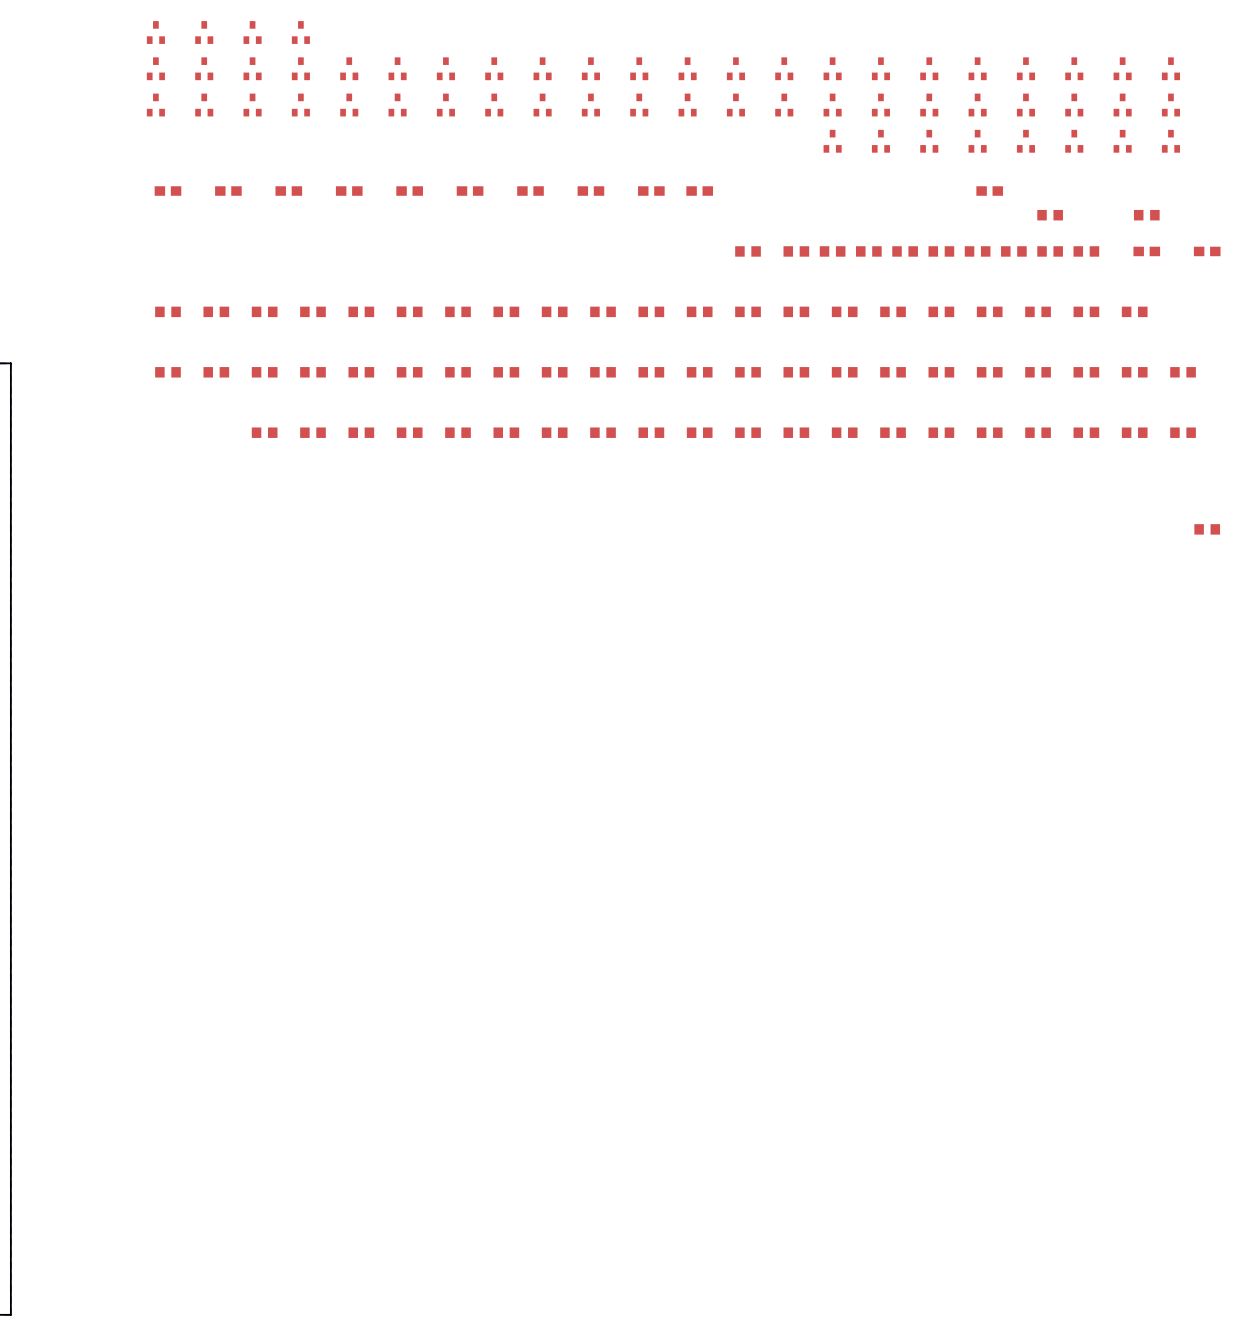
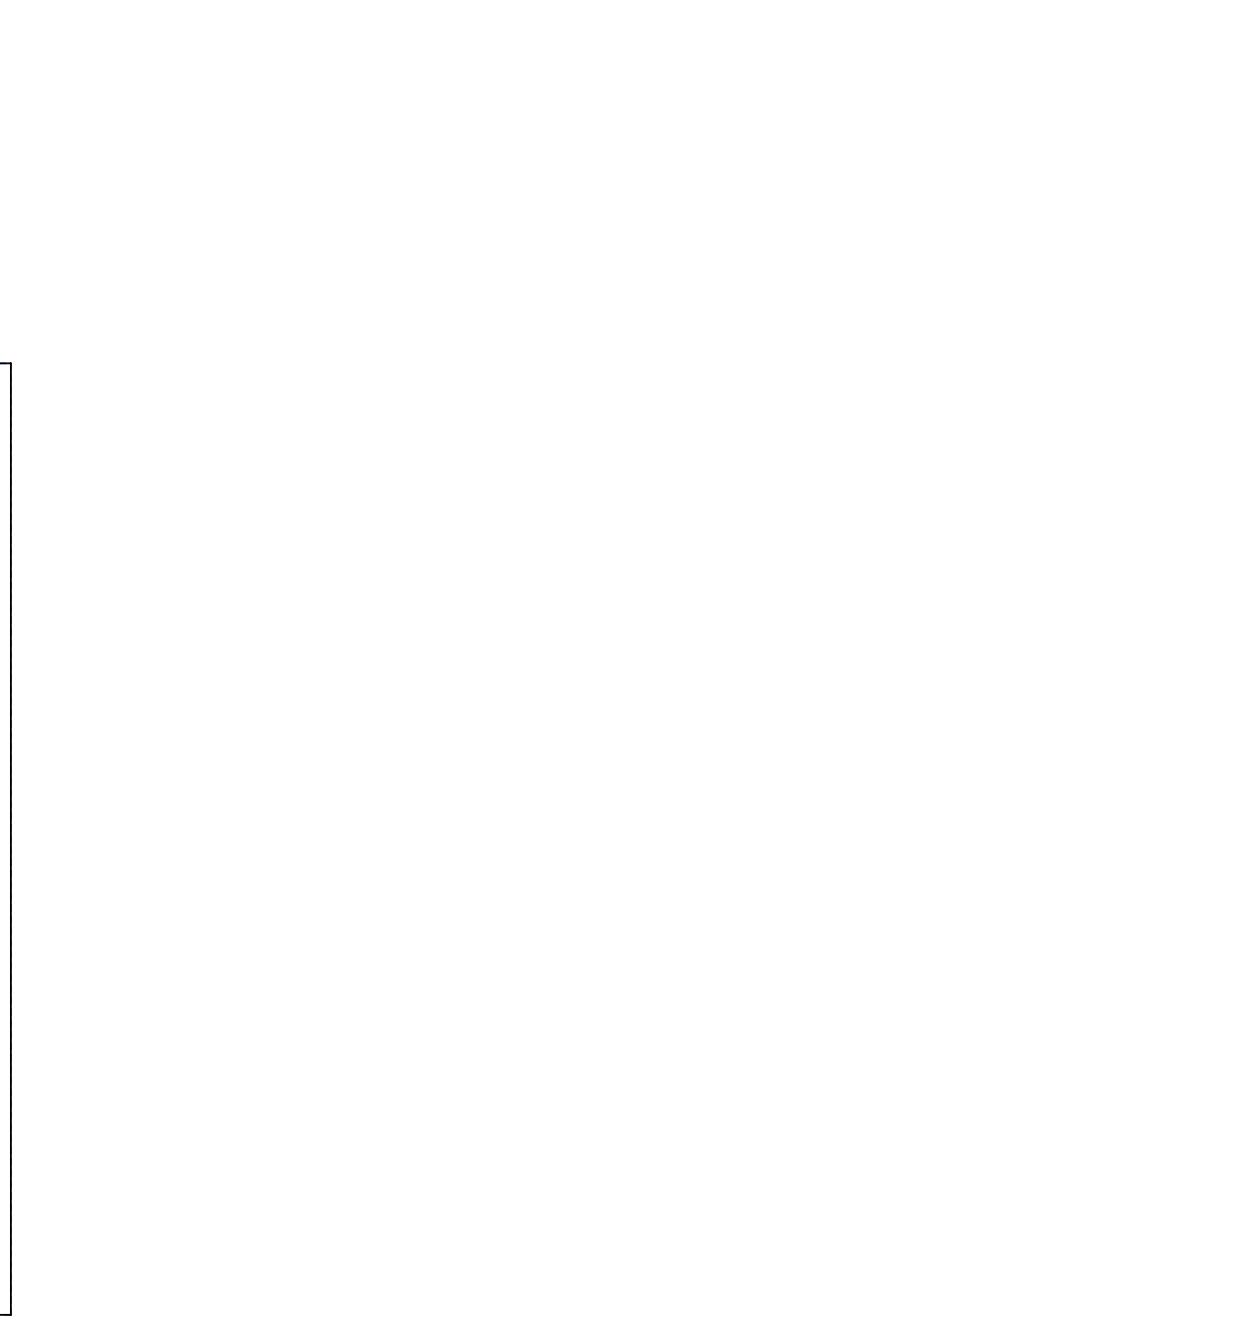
part: (155, 32) -> none
part: (204, 32) -> none
part: (252, 32) -> none
part: (300, 32) -> none
part: (155, 68) -> none
part: (204, 68) -> none
part: (252, 68) -> none
part: (300, 68) -> none
part: (349, 68) -> none
part: (397, 68) -> none
part: (445, 68) -> none
part: (494, 68) -> none
part: (542, 68) -> none
part: (590, 68) -> none
part: (639, 68) -> none
part: (687, 68) -> none
part: (735, 68) -> none
part: (784, 68) -> none
part: (832, 68) -> none
part: (880, 68) -> none
part: (929, 68) -> none
part: (977, 68) -> none
part: (1025, 68) -> none
part: (1074, 68) -> none
part: (1122, 68) -> none
part: (1170, 68) -> none
part: (155, 105) -> none
part: (204, 105) -> none
part: (252, 105) -> none
part: (300, 105) -> none
part: (349, 105) -> none
part: (397, 105) -> none
part: (445, 105) -> none
part: (494, 105) -> none
part: (542, 105) -> none
part: (590, 105) -> none
part: (639, 105) -> none
part: (687, 105) -> none
part: (735, 105) -> none
part: (784, 105) -> none
part: (832, 105) -> none
part: (880, 105) -> none
part: (929, 105) -> none
part: (977, 105) -> none
part: (1025, 105) -> none
part: (1074, 105) -> none
part: (1122, 105) -> none
part: (1170, 105) -> none
part: (832, 141) -> none
part: (880, 141) -> none
part: (929, 141) -> none
part: (977, 141) -> none
part: (1025, 141) -> none
part: (1074, 141) -> none
part: (1122, 141) -> none
part: (1170, 141) -> none
part: (167, 191) -> none
part: (228, 191) -> none
part: (288, 191) -> none
part: (349, 191) -> none
part: (409, 191) -> none
part: (470, 191) -> none
part: (530, 191) -> none
part: (590, 191) -> none
part: (651, 191) -> none
part: (699, 191) -> none
part: (989, 191) -> none
part: (1050, 215) -> none
part: (1146, 215) -> none
part: (748, 251) -> none
part: (796, 251) -> none
part: (832, 251) -> none
part: (868, 251) -> none
part: (905, 251) -> none
part: (941, 251) -> none
part: (977, 251) -> none
part: (1013, 251) -> none
part: (1050, 251) -> none
part: (1086, 251) -> none
part: (1146, 251) -> none
part: (1207, 251) -> none
part: (167, 311) -> none
part: (216, 311) -> none
part: (264, 311) -> none
part: (312, 311) -> none
part: (361, 311) -> none
part: (409, 311) -> none
part: (458, 311) -> none
part: (506, 311) -> none
part: (554, 311) -> none
part: (603, 311) -> none
part: (651, 311) -> none
part: (699, 311) -> none
part: (748, 311) -> none
part: (796, 311) -> none
part: (844, 311) -> none
part: (893, 311) -> none
part: (941, 311) -> none
part: (989, 311) -> none
part: (1038, 311) -> none
part: (1086, 311) -> none
part: (1134, 311) -> none
part: (167, 372) -> none
part: (216, 372) -> none
part: (264, 372) -> none
part: (312, 372) -> none
part: (361, 372) -> none
part: (409, 372) -> none
part: (458, 372) -> none
part: (506, 372) -> none
part: (554, 372) -> none
part: (603, 372) -> none
part: (651, 372) -> none
part: (699, 372) -> none
part: (748, 372) -> none
part: (796, 372) -> none
part: (844, 372) -> none
part: (893, 372) -> none
part: (941, 372) -> none
part: (989, 372) -> none
part: (1038, 372) -> none
part: (1086, 372) -> none
part: (1134, 372) -> none
part: (1183, 372) -> none
part: (264, 432) -> none
part: (312, 432) -> none
part: (361, 432) -> none
part: (409, 432) -> none
part: (458, 432) -> none
part: (506, 432) -> none
part: (554, 432) -> none
part: (603, 432) -> none
part: (651, 432) -> none
part: (699, 432) -> none
part: (748, 432) -> none
part: (796, 432) -> none
part: (844, 432) -> none
part: (893, 432) -> none
part: (941, 432) -> none
part: (989, 432) -> none
part: (1038, 432) -> none
part: (1086, 432) -> none
part: (1134, 432) -> none
part: (1183, 432) -> none
part: (1207, 529) -> none

